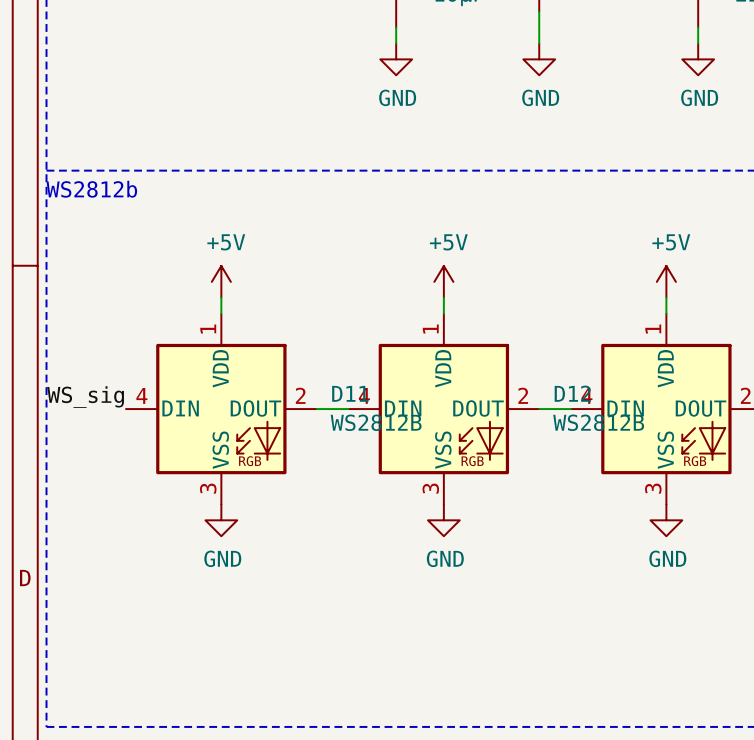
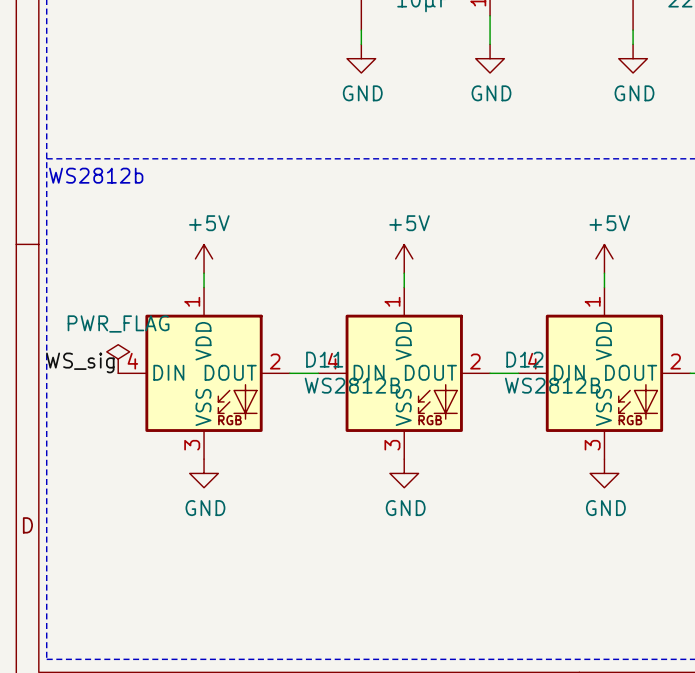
power symbol: none -> PWR_FLAG (118, 359)

